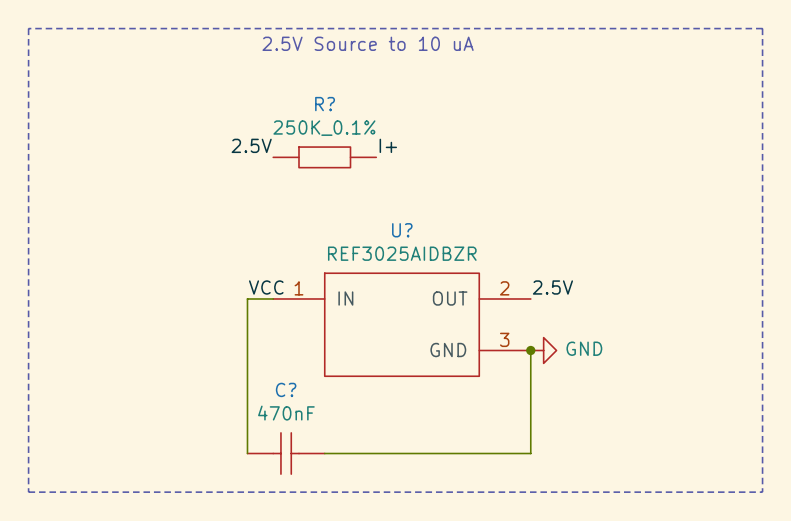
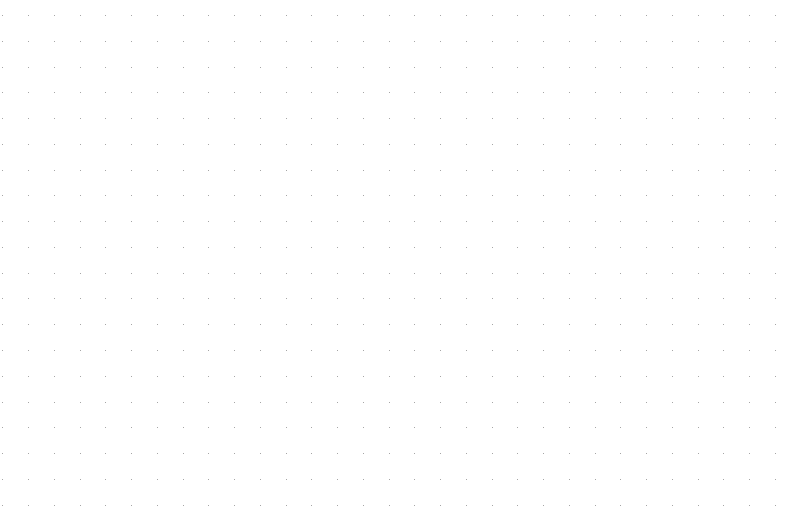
line: (28, 28) (28, 492) (762, 492) (762, 28) (28, 28) -> none
text: 2.5V Source to 10 uA (368, 43) -> none
label: 2.5V (251, 145) -> none
label: I+ (388, 145) -> none
R?: 250K_0.1% (324, 157) -> none
label: VCC (266, 287) -> none
label: 2.5V (552, 287) -> none
wire: (273, 298) (247, 298) (247, 453) -> none
U?: REF3025AIDBZR (402, 324) -> none
wire: (530, 350) (530, 453) (324, 453) -> none
junction: (530, 350) -> none
power symbol: GND (543, 350) -> none
C?: 470nF (286, 453) -> none

